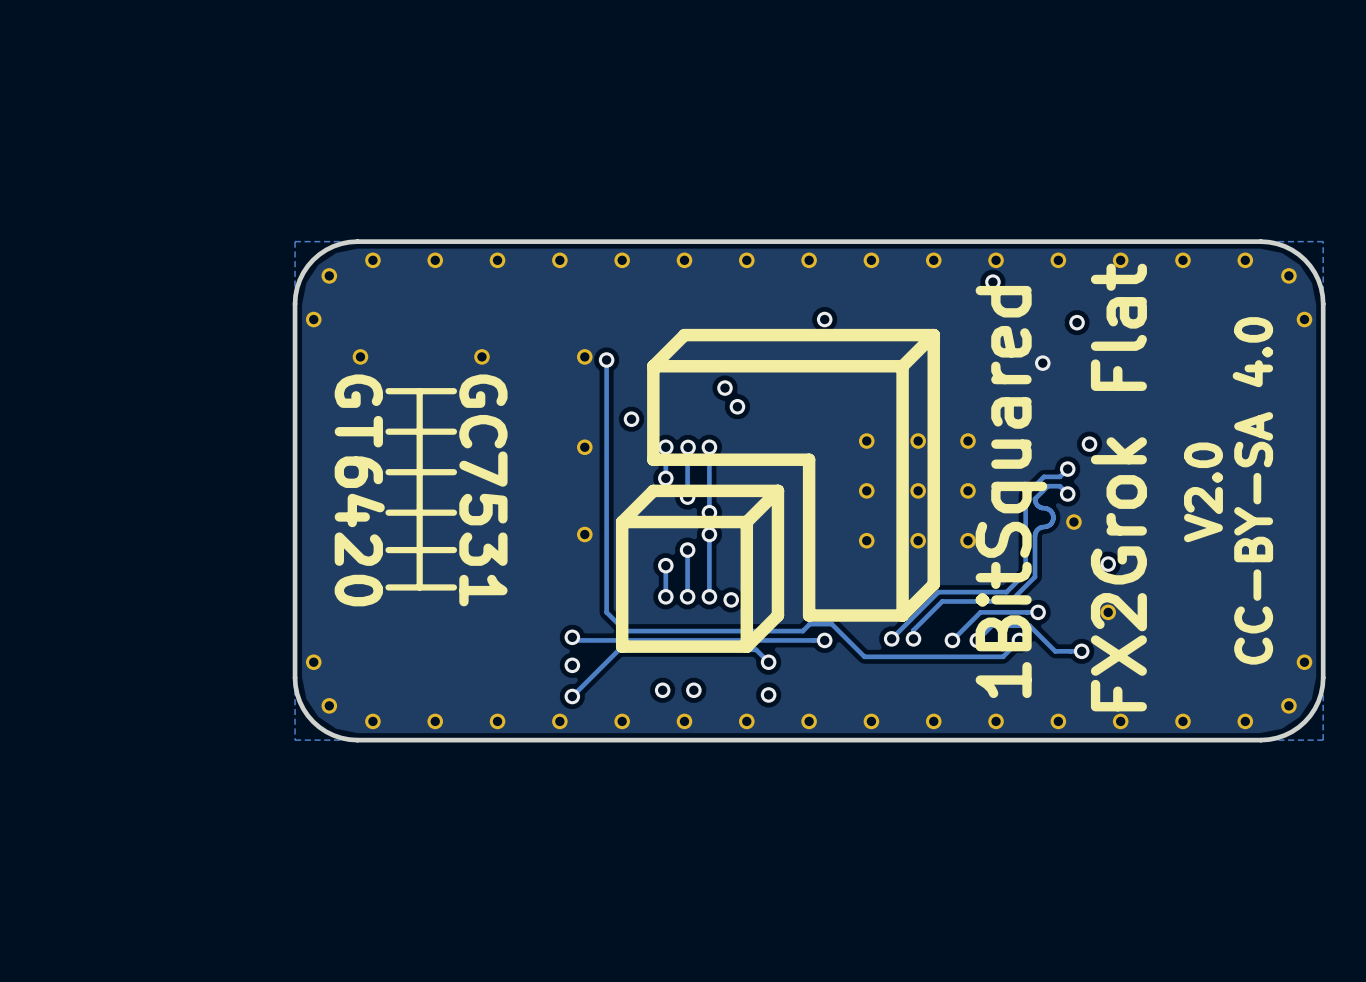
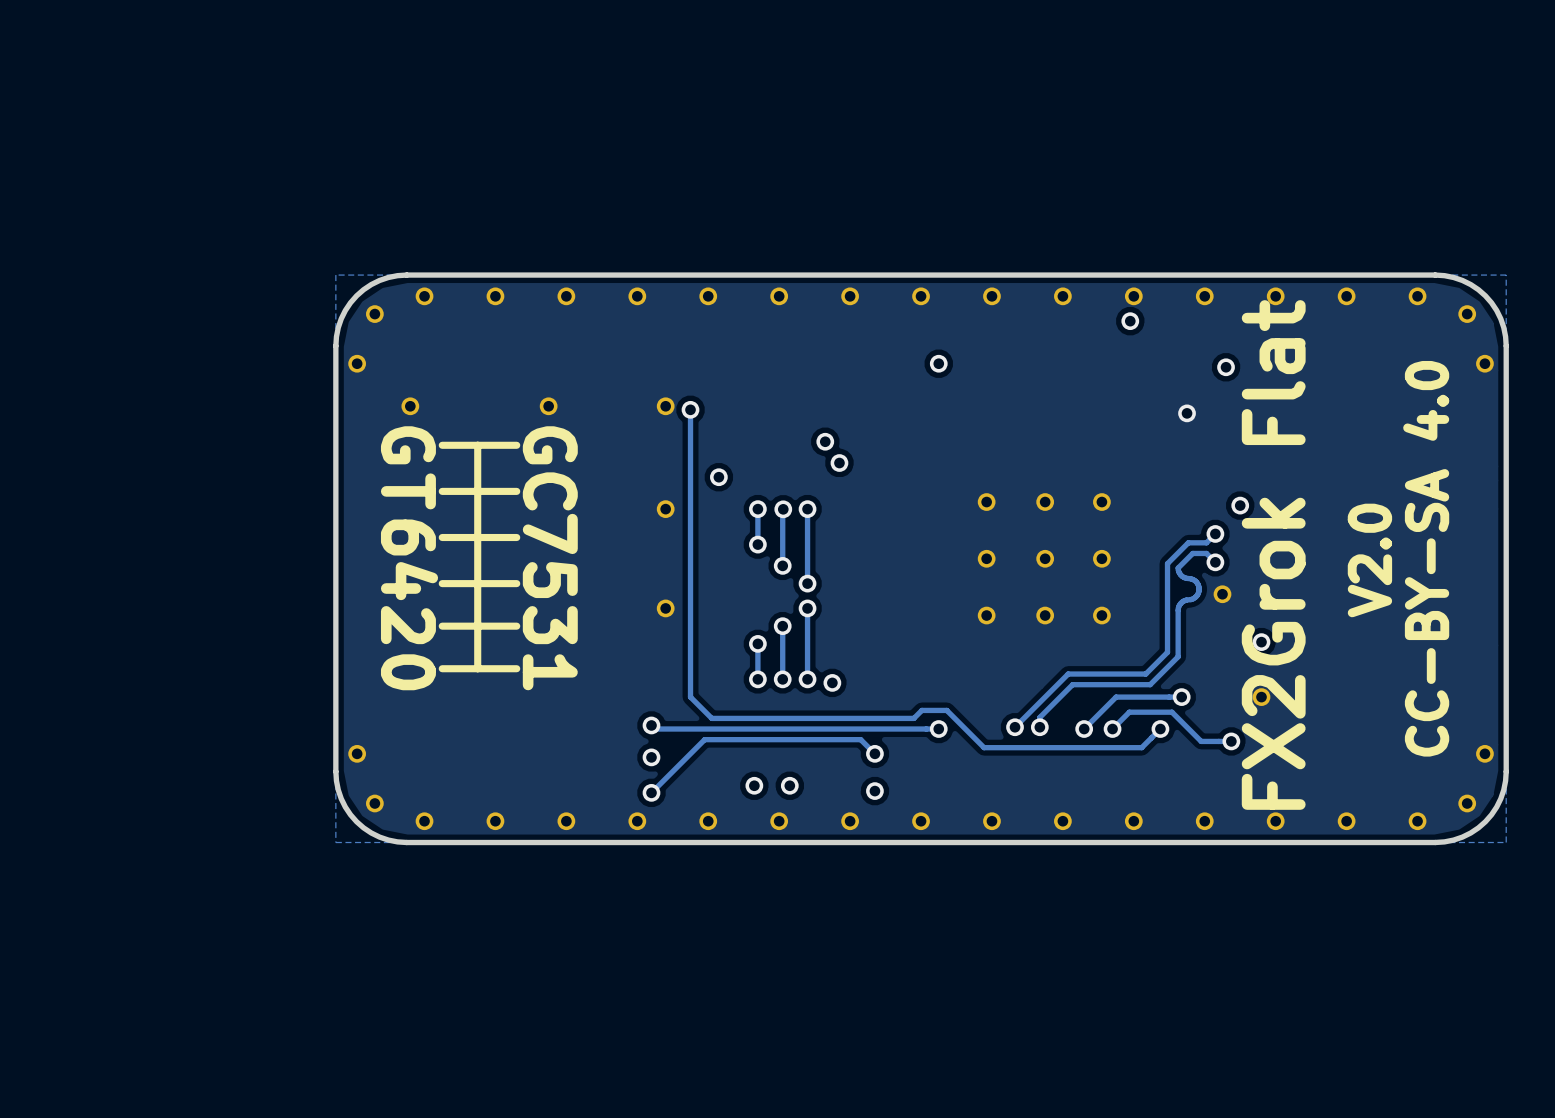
drawing: [615, 328, 940, 653] -> none
text: 1BitSquared (1011, 491) -> none

